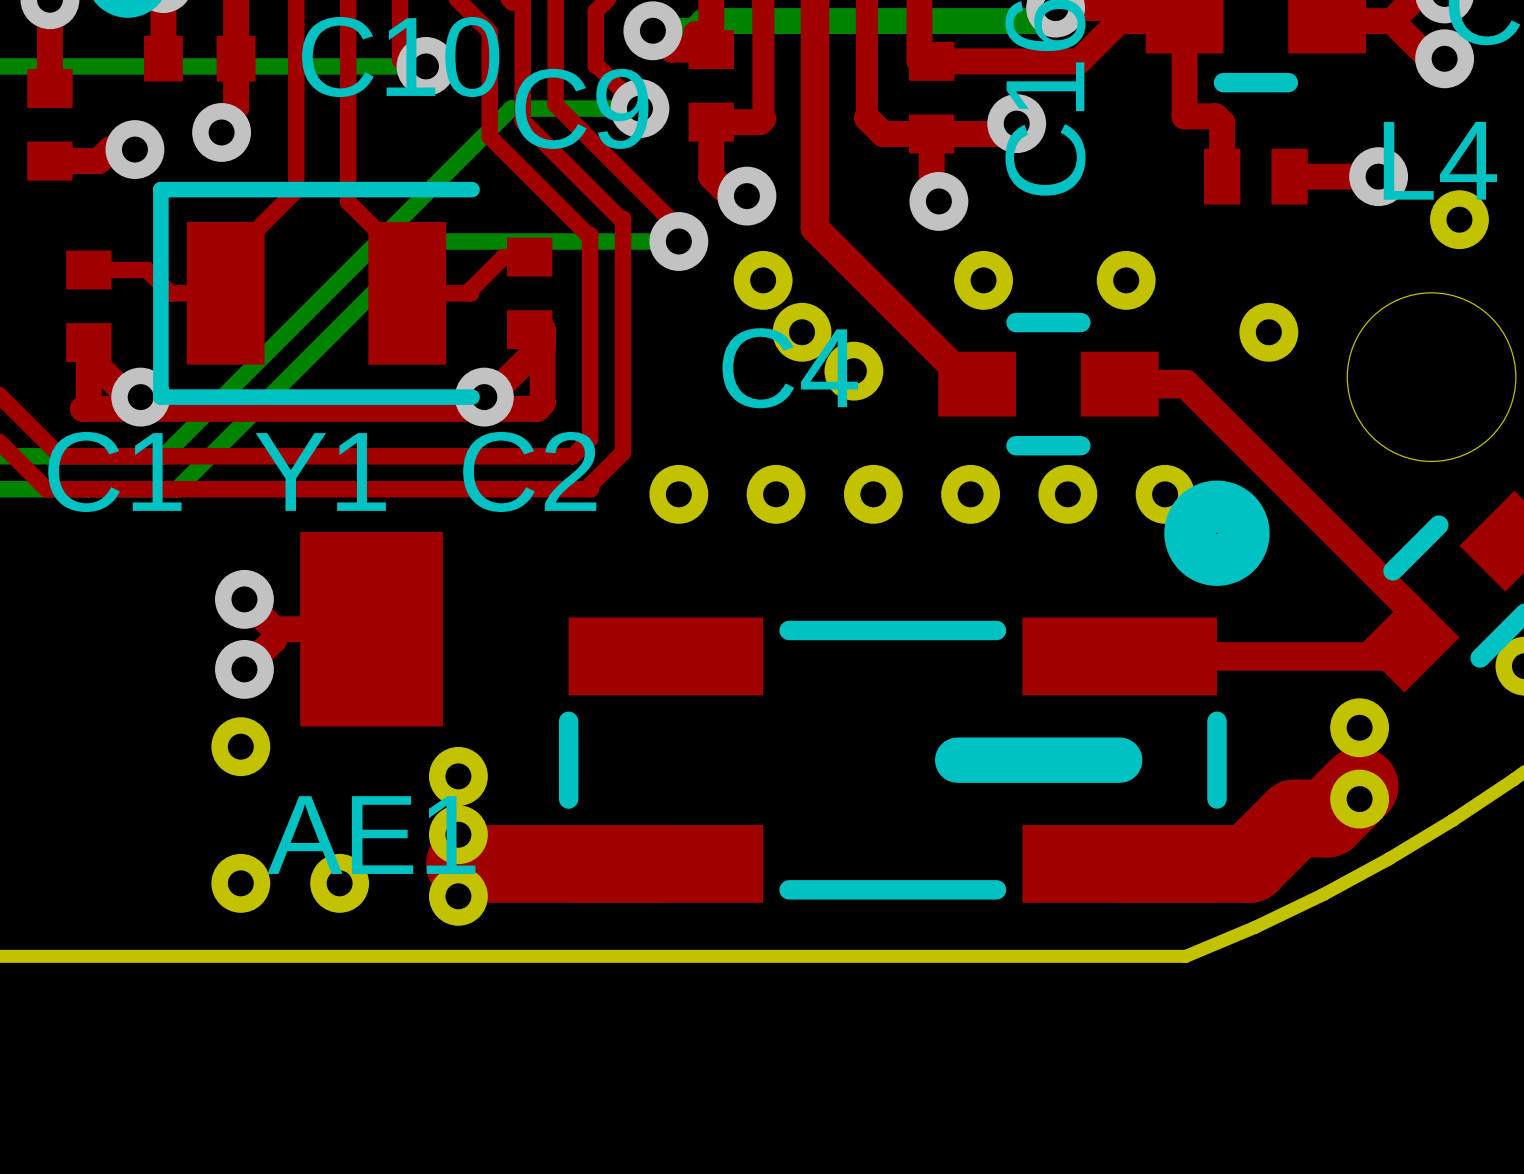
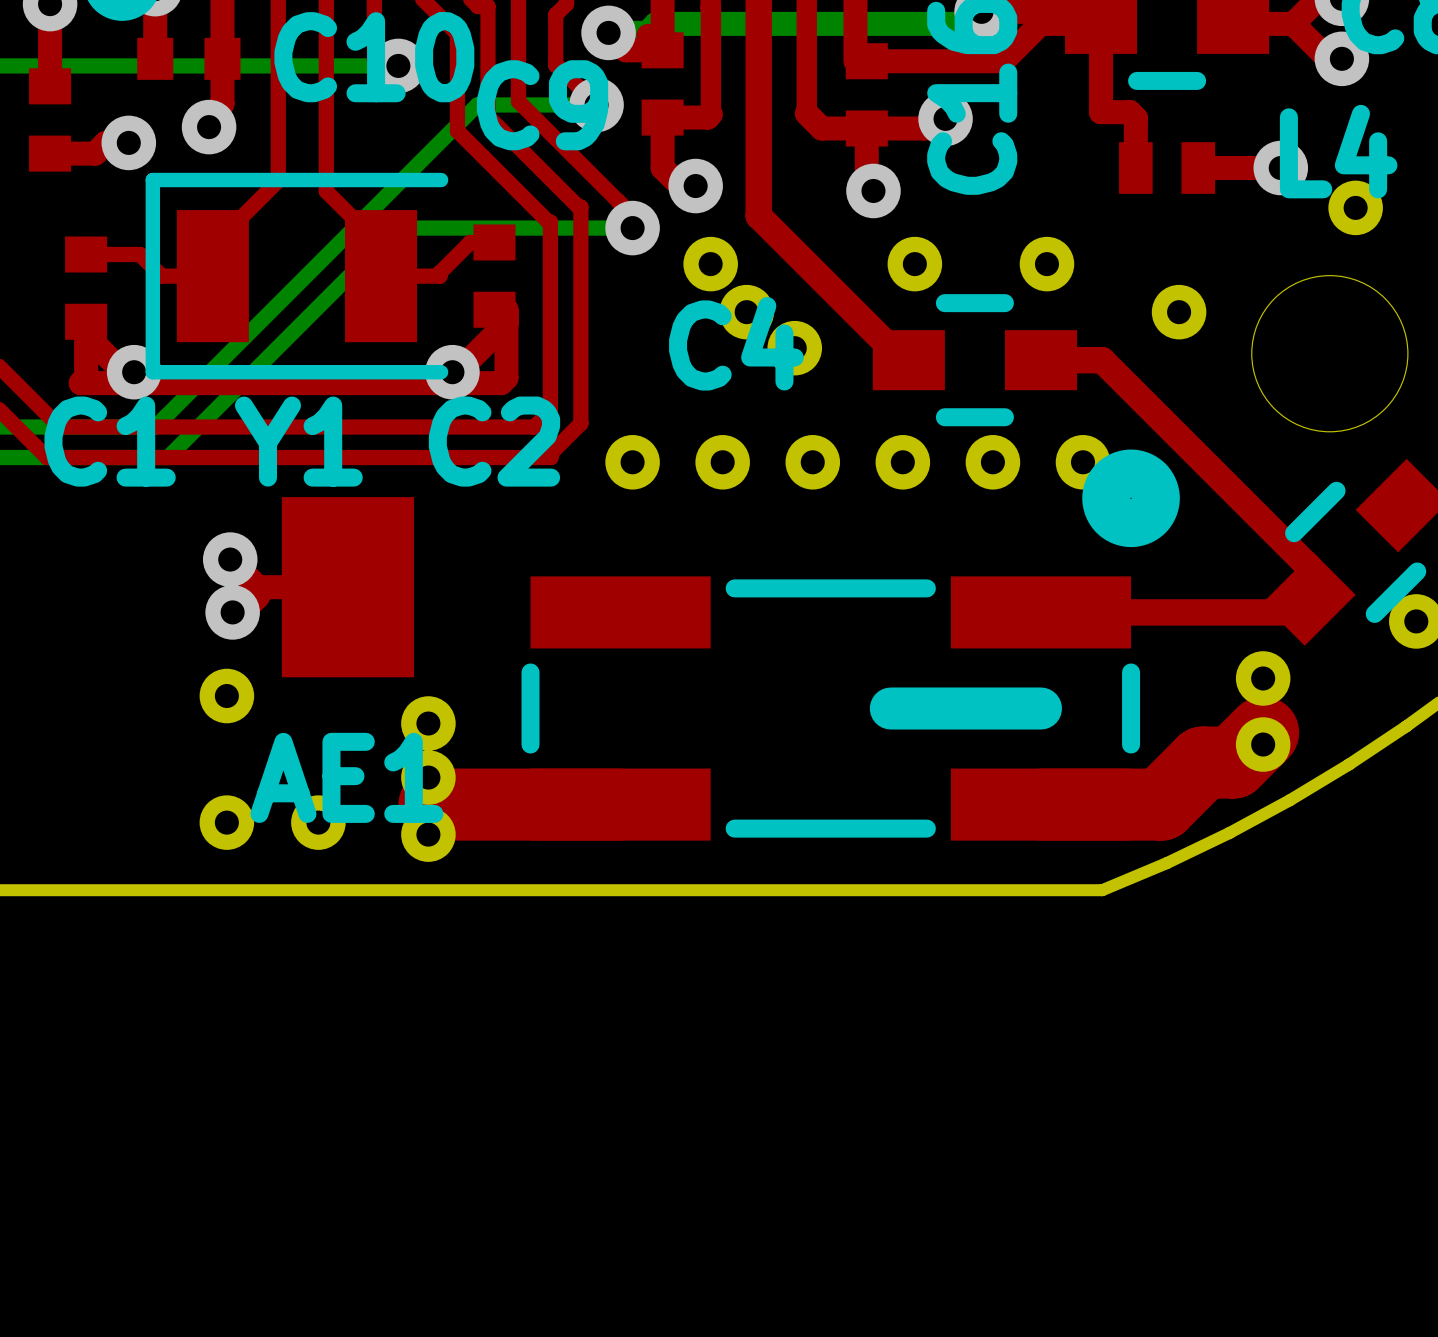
via position: (244, 669) -> (232, 612)

